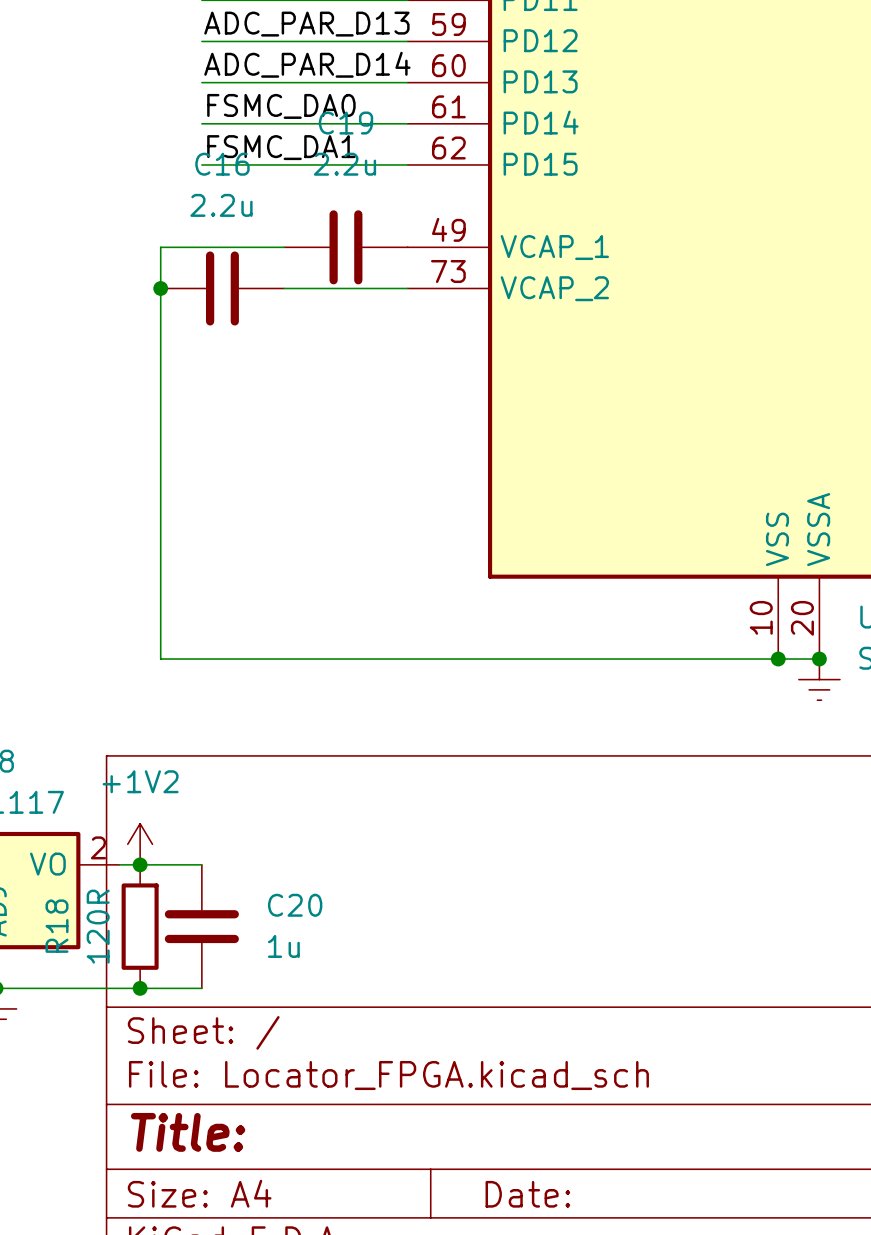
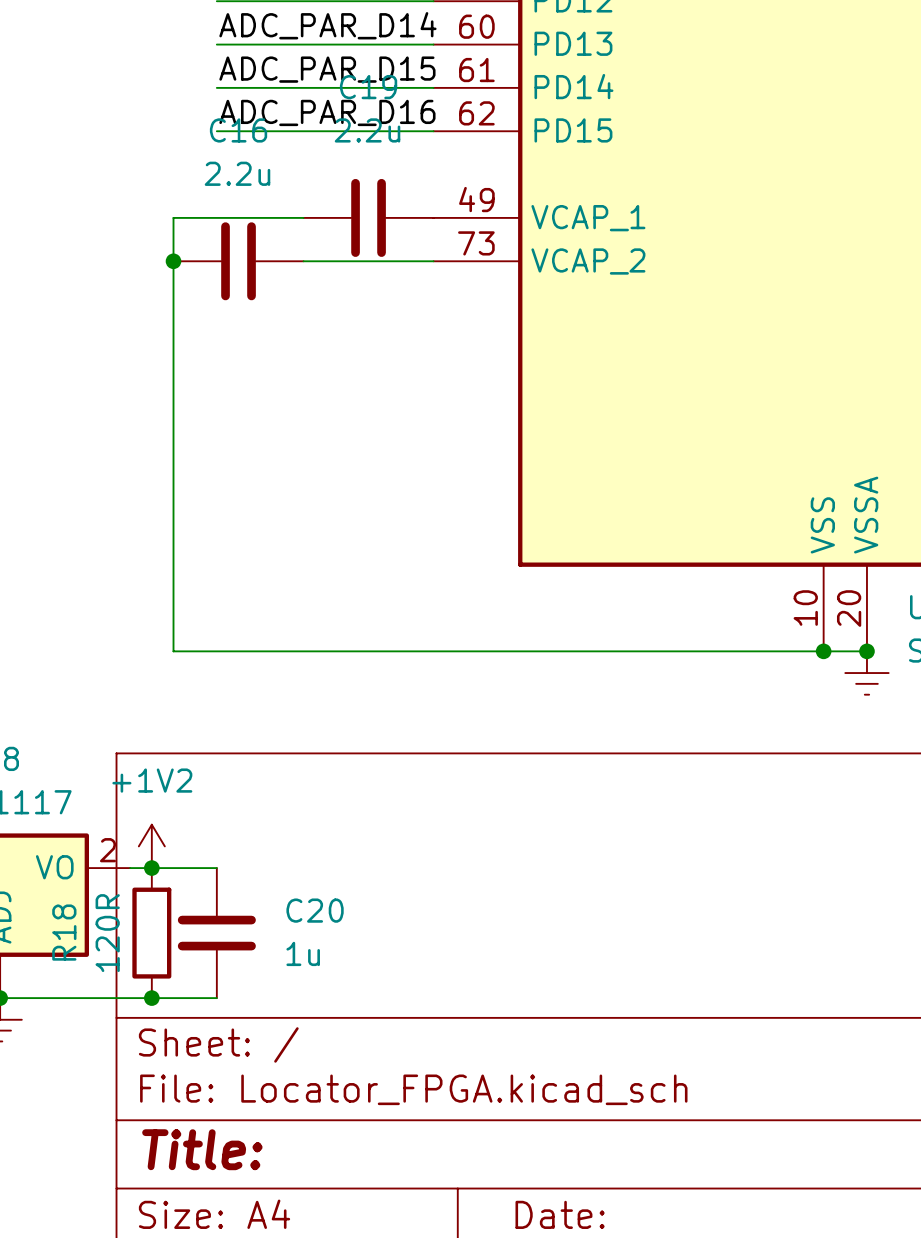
label: FSMC_DA0 (281, 106) -> ADC_PAR_D15 (327, 69)
label: FSMC_DA1 (281, 147) -> ADC_PAR_D16 (327, 112)

